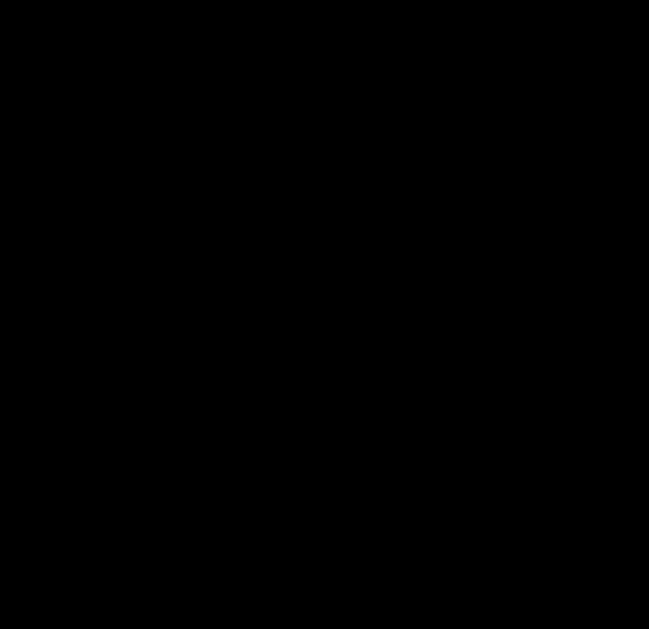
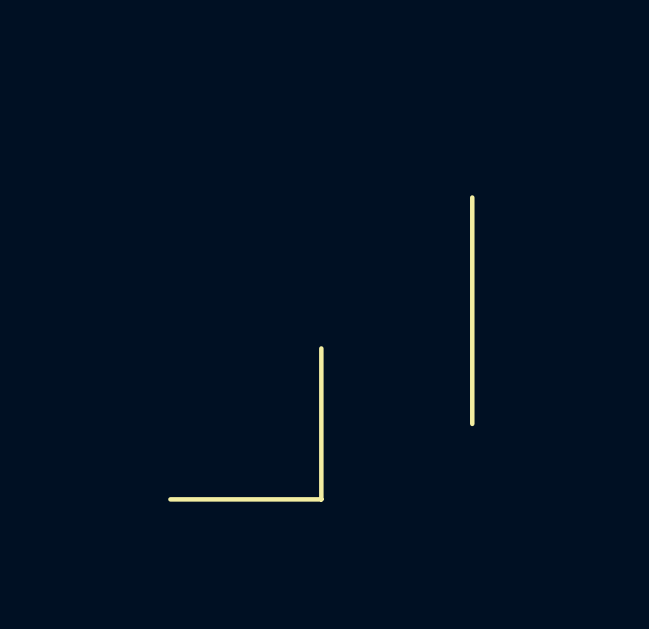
line: none -> (472, 197) (472, 423)
line: none -> (321, 348) (321, 499) (170, 499)

